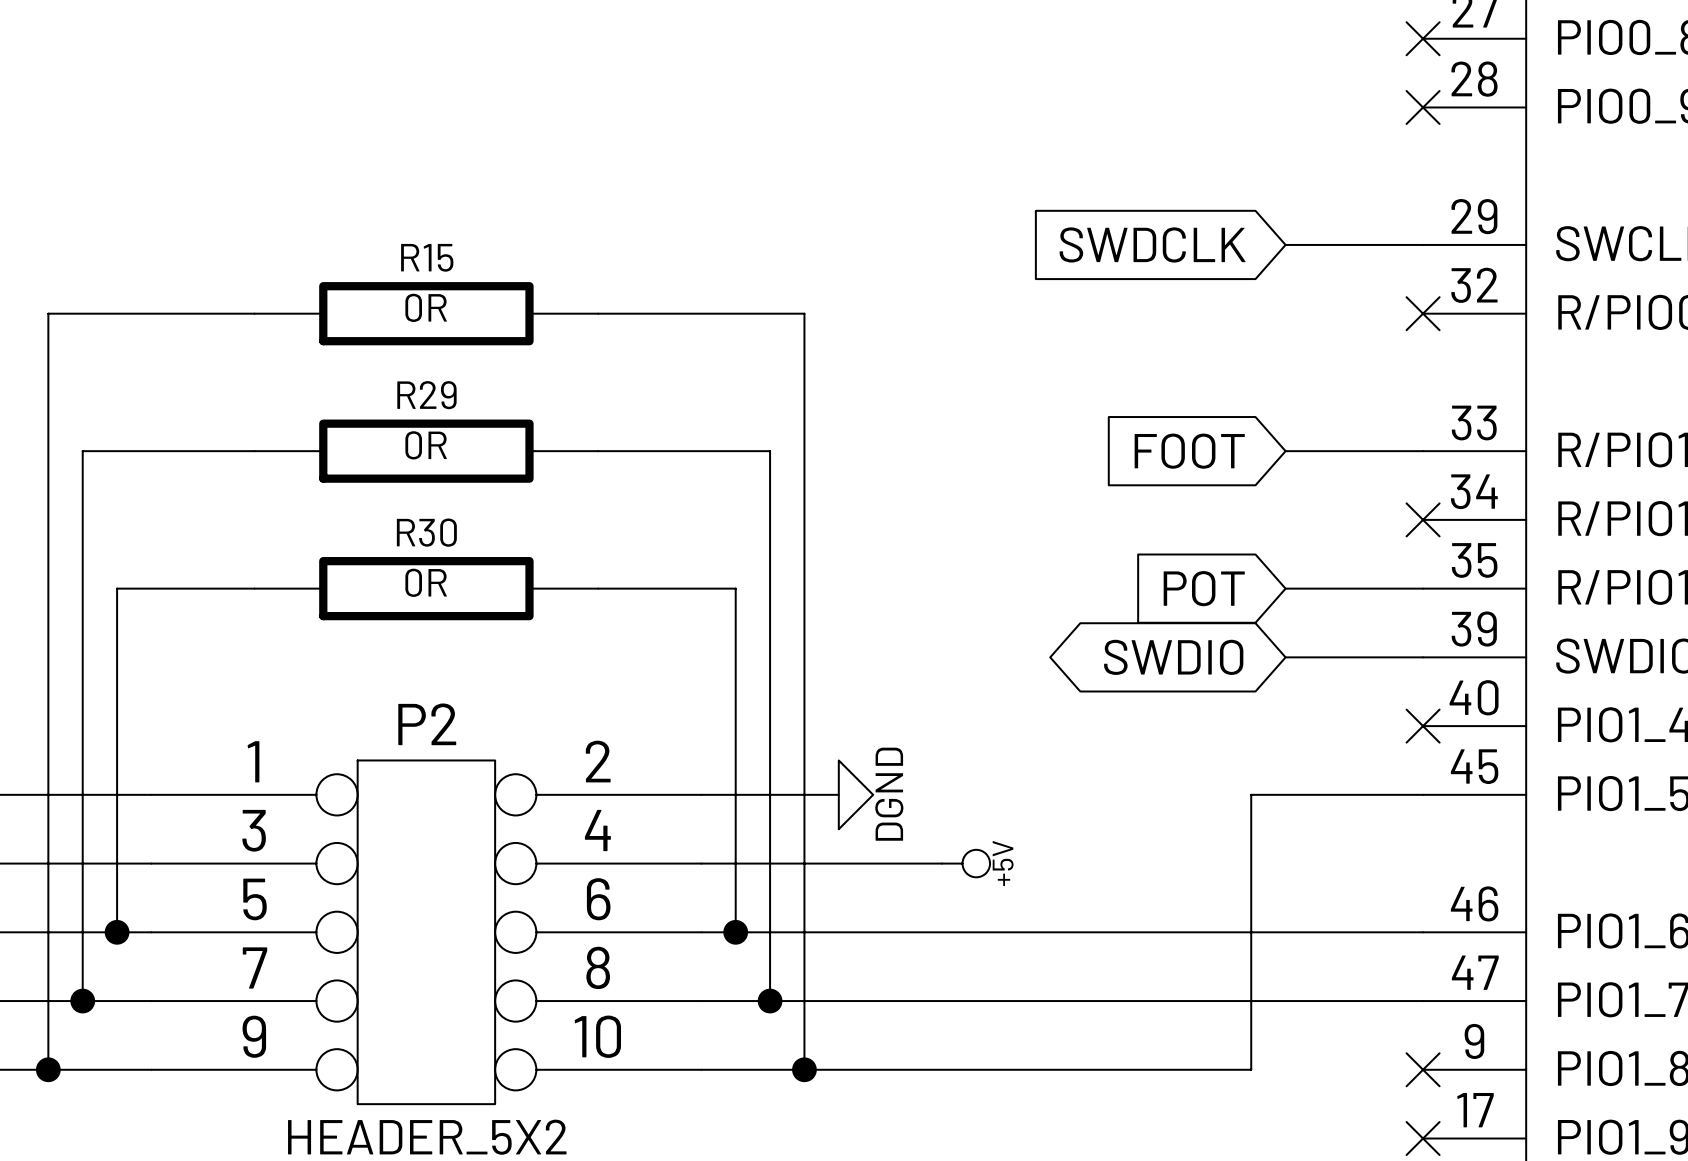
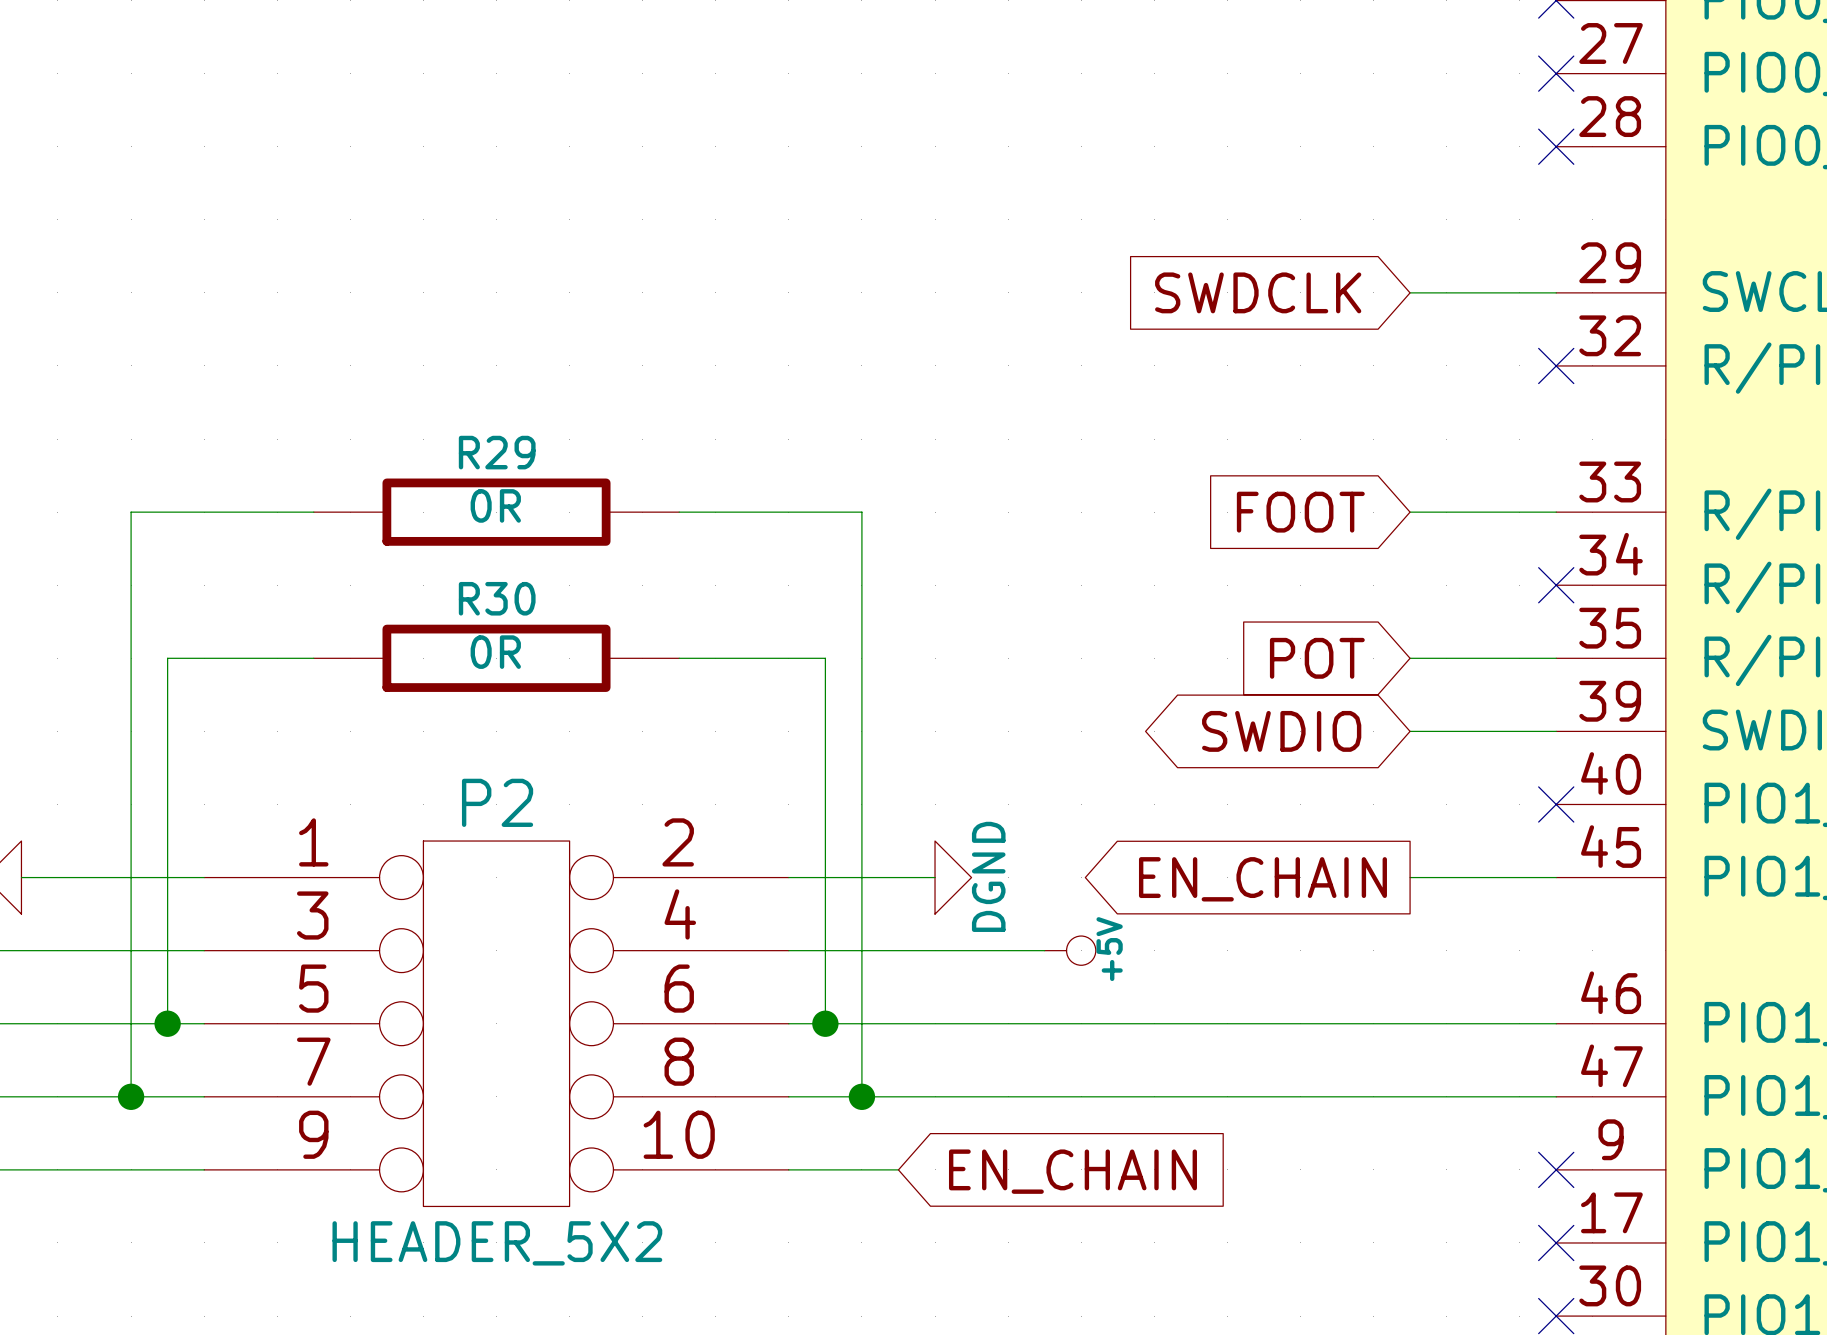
wire: (254, 313) (48, 313) (48, 1069) -> none
R15: 0R (426, 313) -> none
wire: (598, 313) (804, 313) (804, 1069) (1251, 1069) (1251, 794) (1285, 794) -> none
global label: none -> EN_CHAIN (1262, 879)
junction: (48, 1069) -> none
junction: (804, 1069) -> none
global label: none -> EN_CHAIN (1072, 1171)

